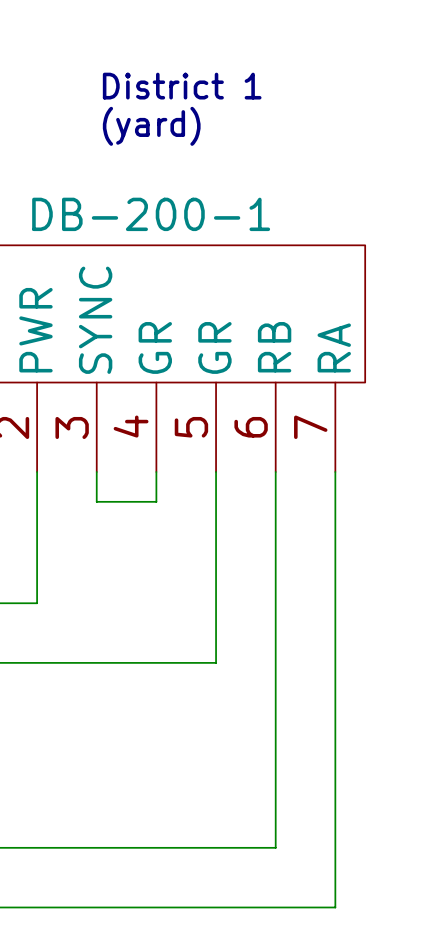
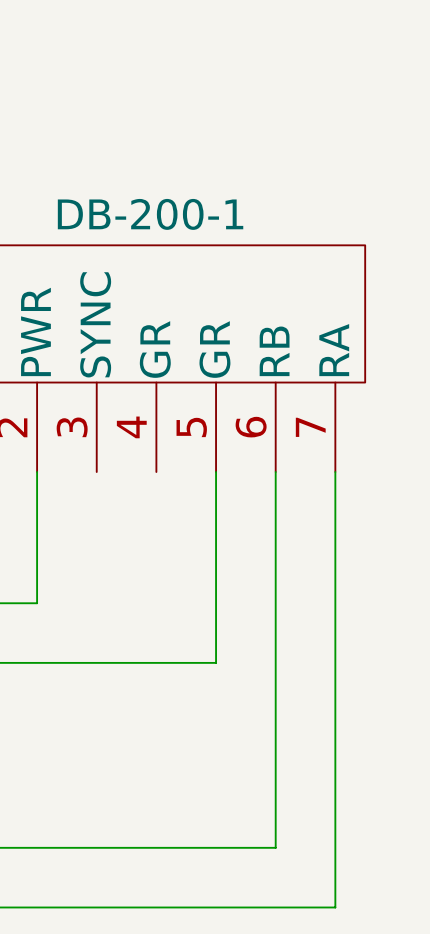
text: District 1 (182, 86) -> none
text: (yard) (151, 126) -> none
wire: (96, 472) (96, 501) (156, 501) (156, 472) -> none

